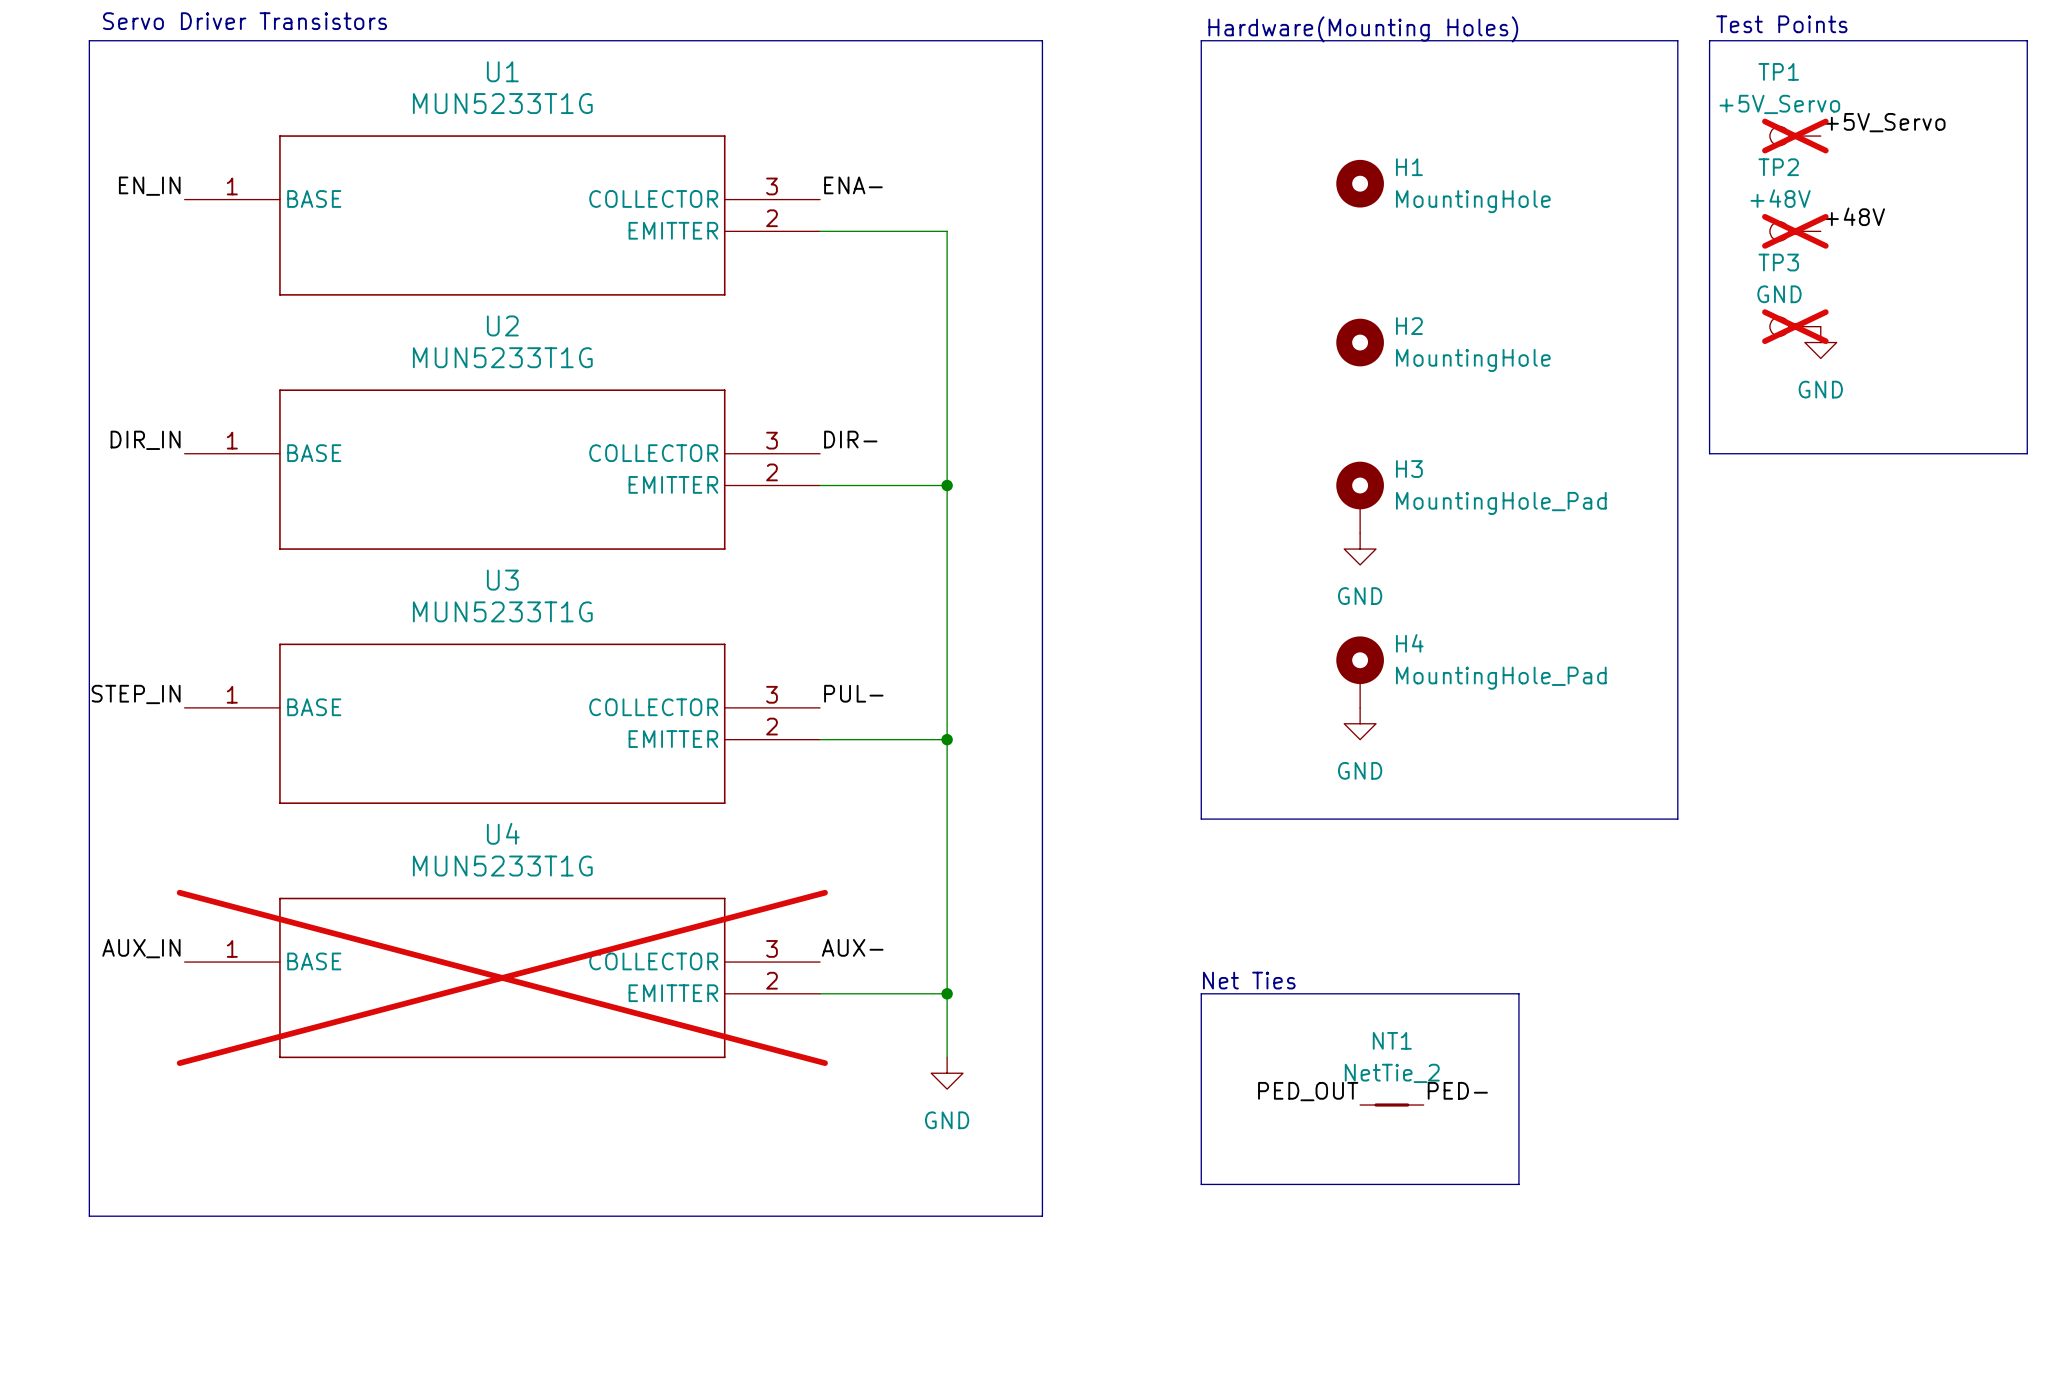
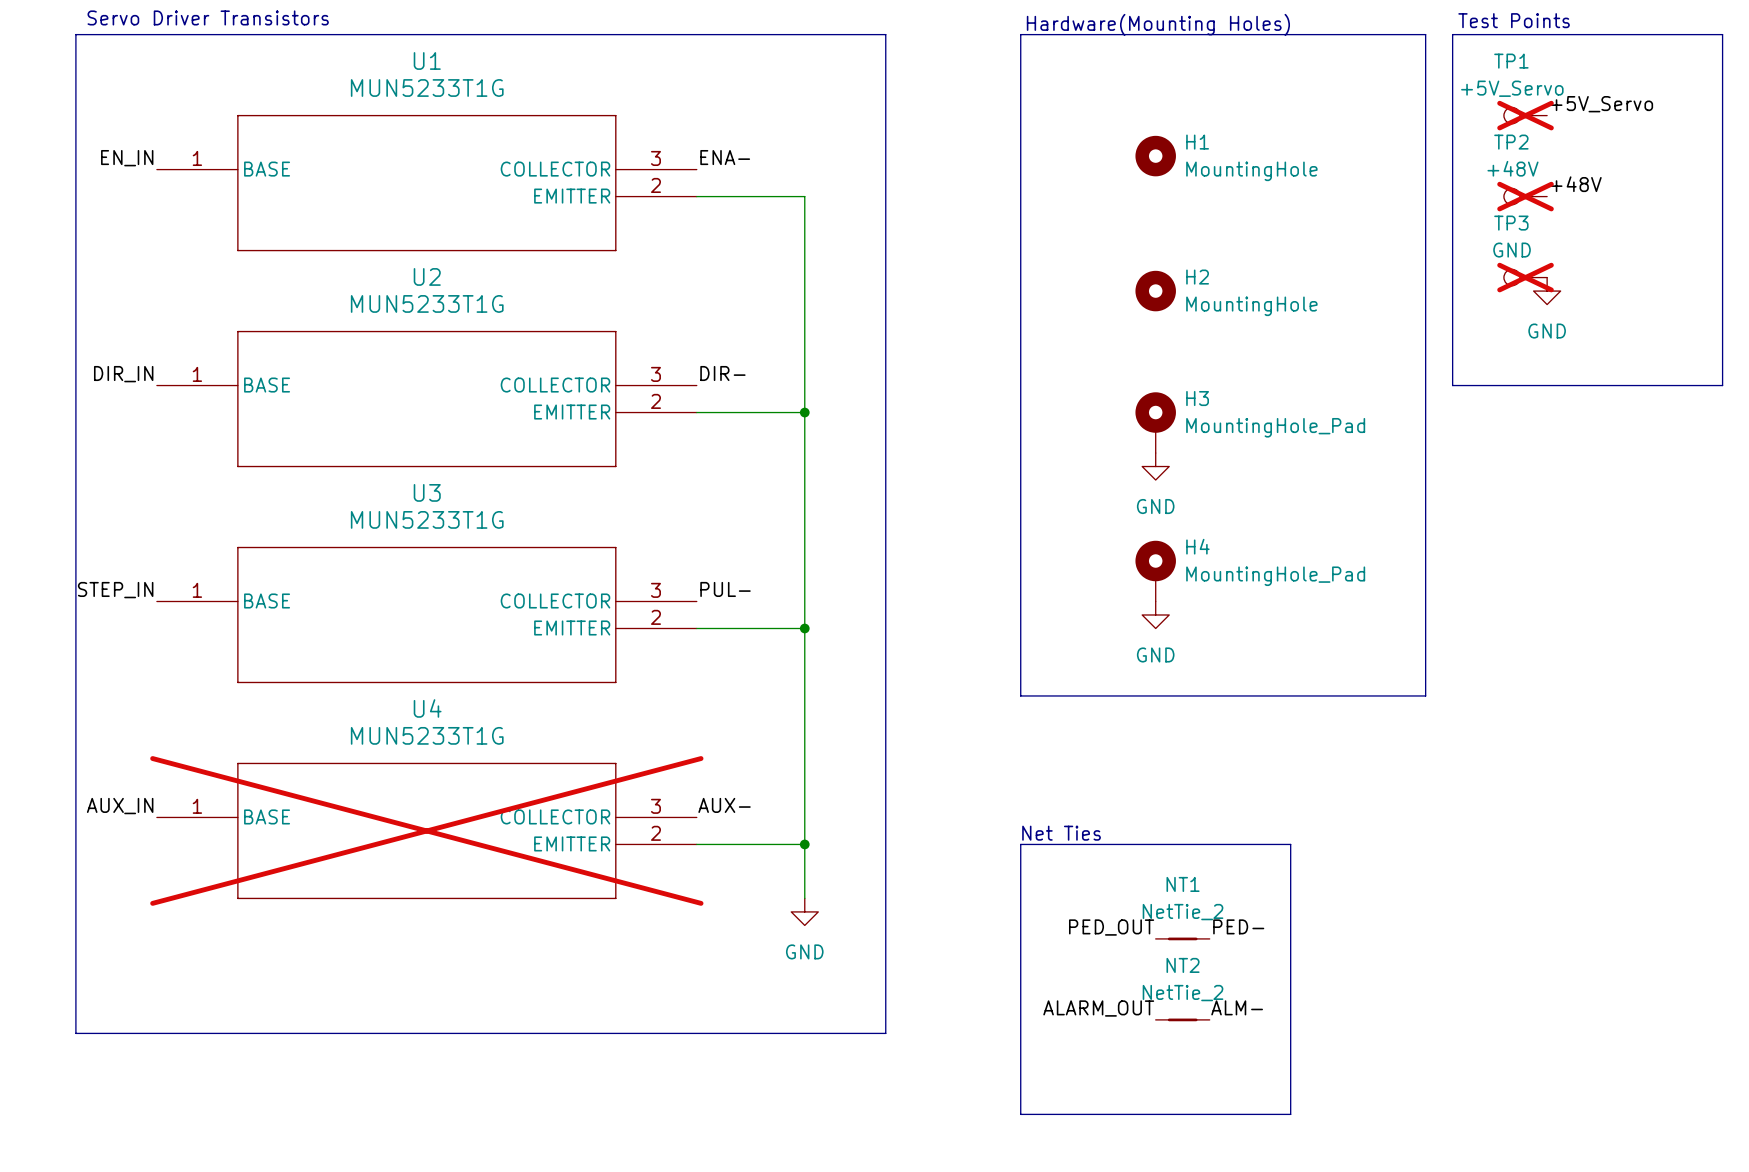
line: (1201, 1184) (1518, 1184) -> (1020, 1006) (1020, 1114) (1290, 1114) (1290, 1006)
label: none -> ALARM_OUT (1098, 1008)
label: none -> ALM- (1237, 1007)
NT2: none -> NetTie_2 (1182, 1019)

